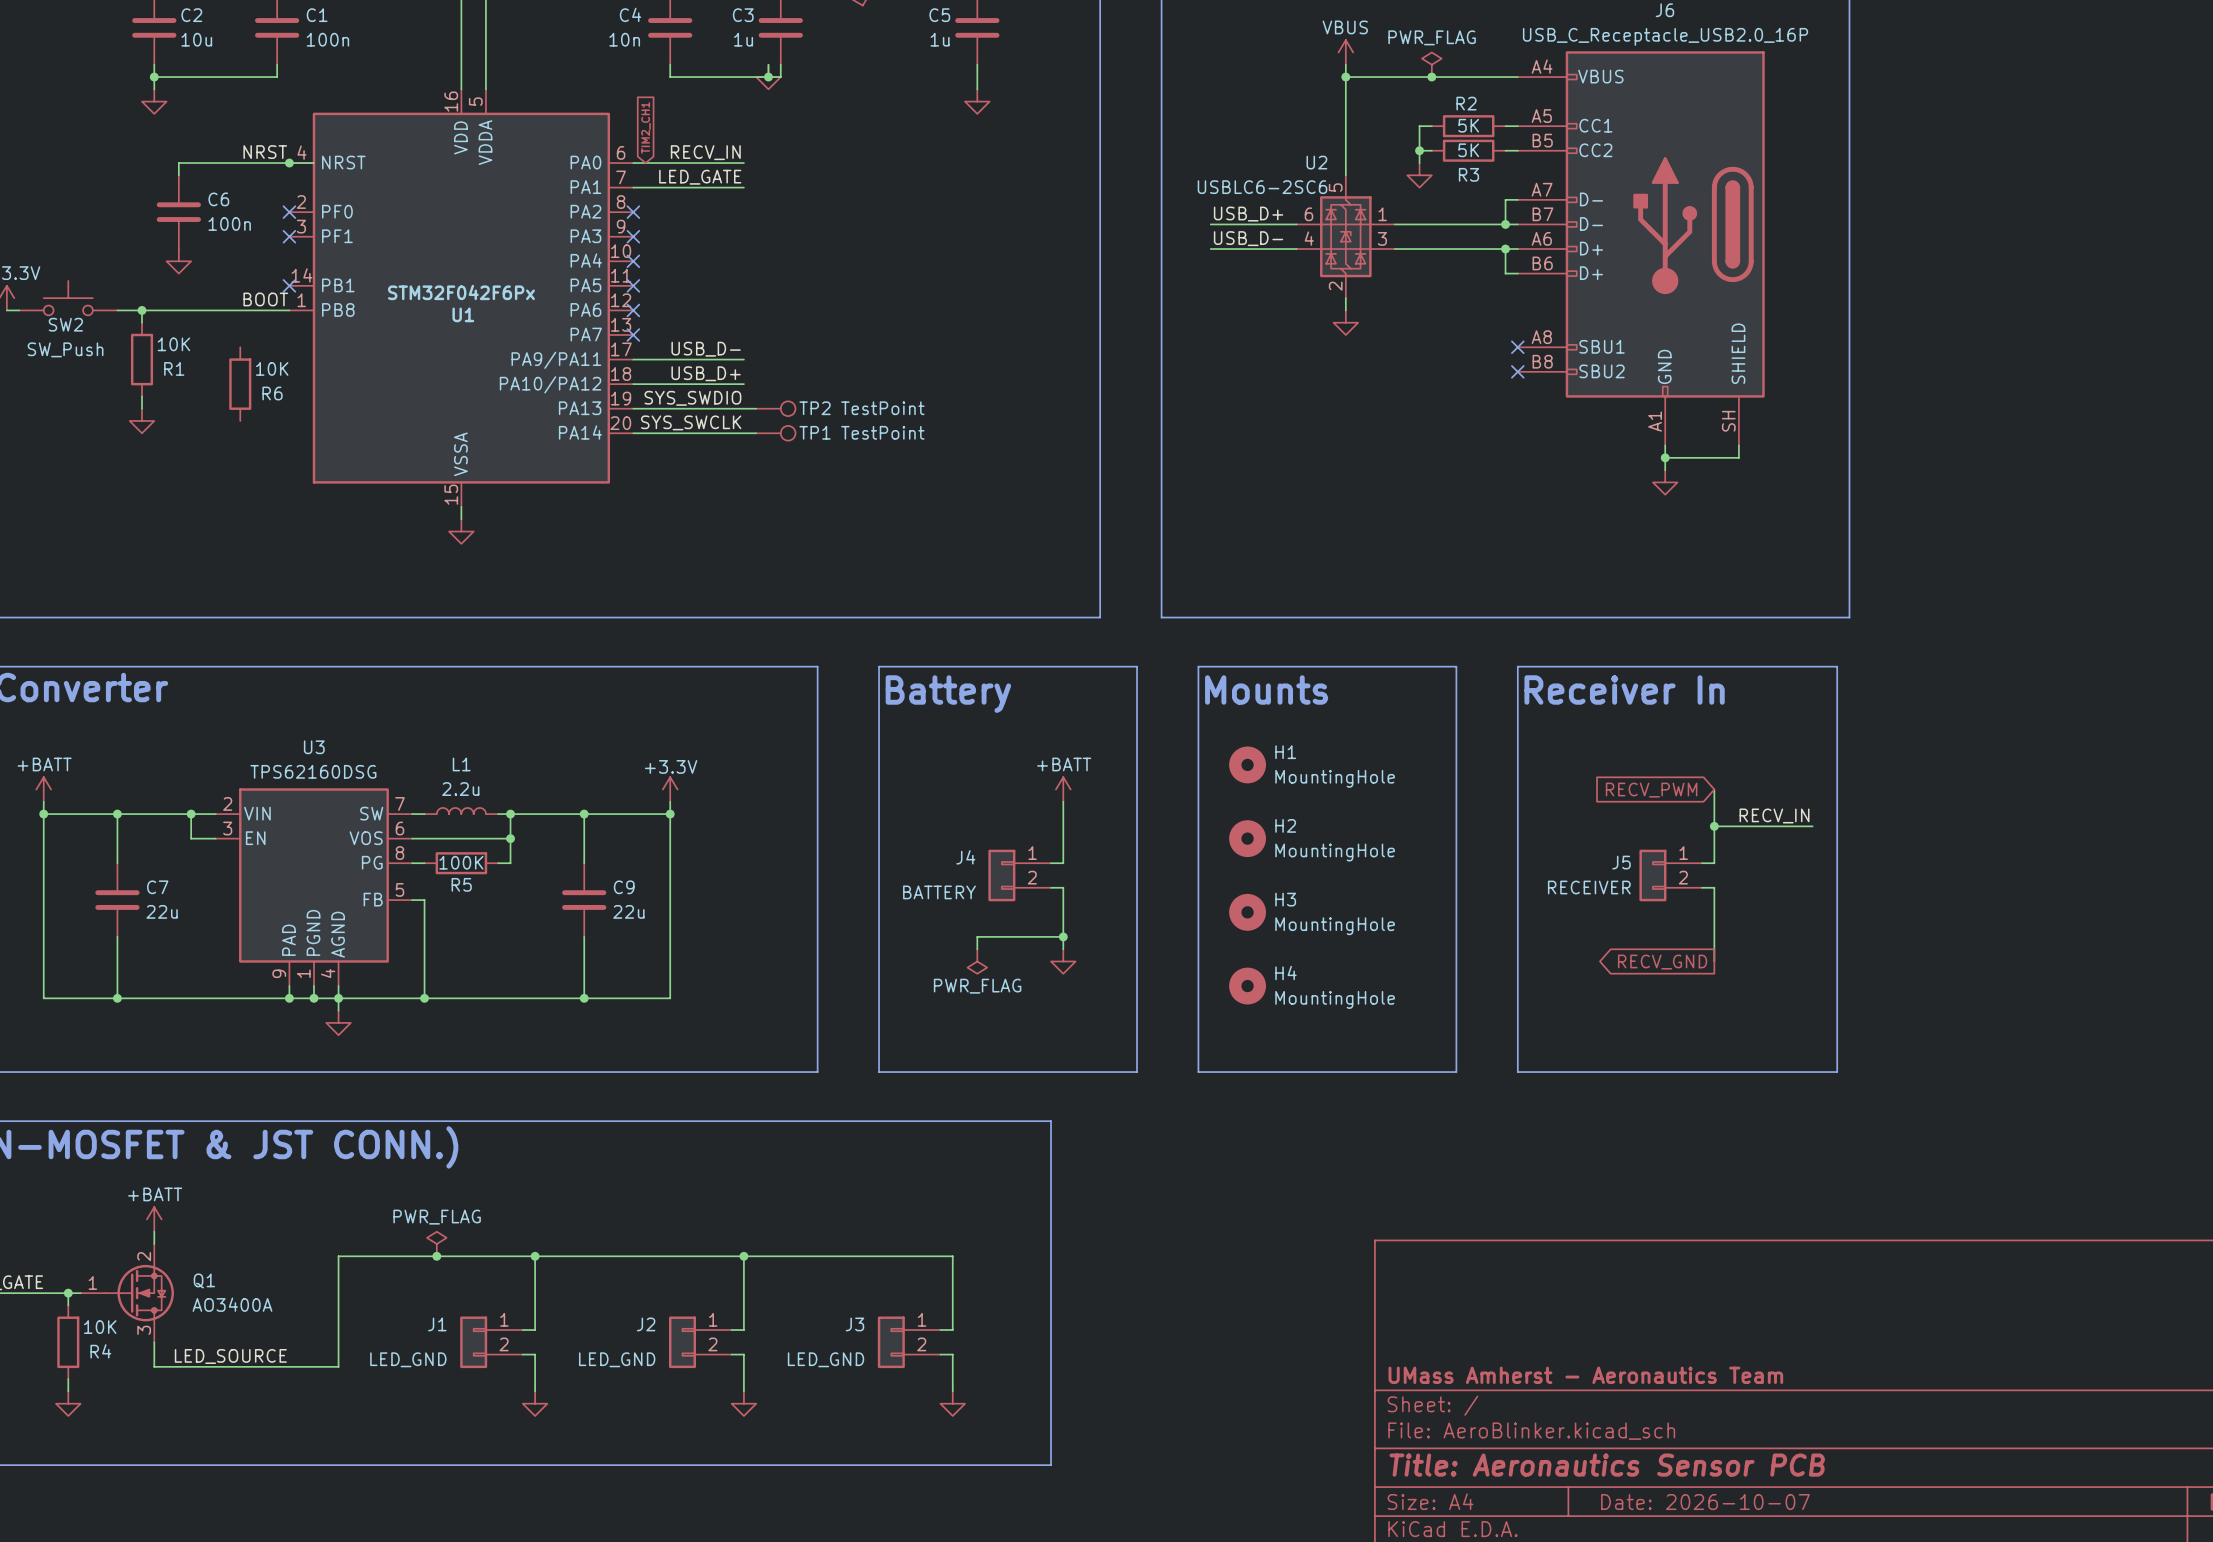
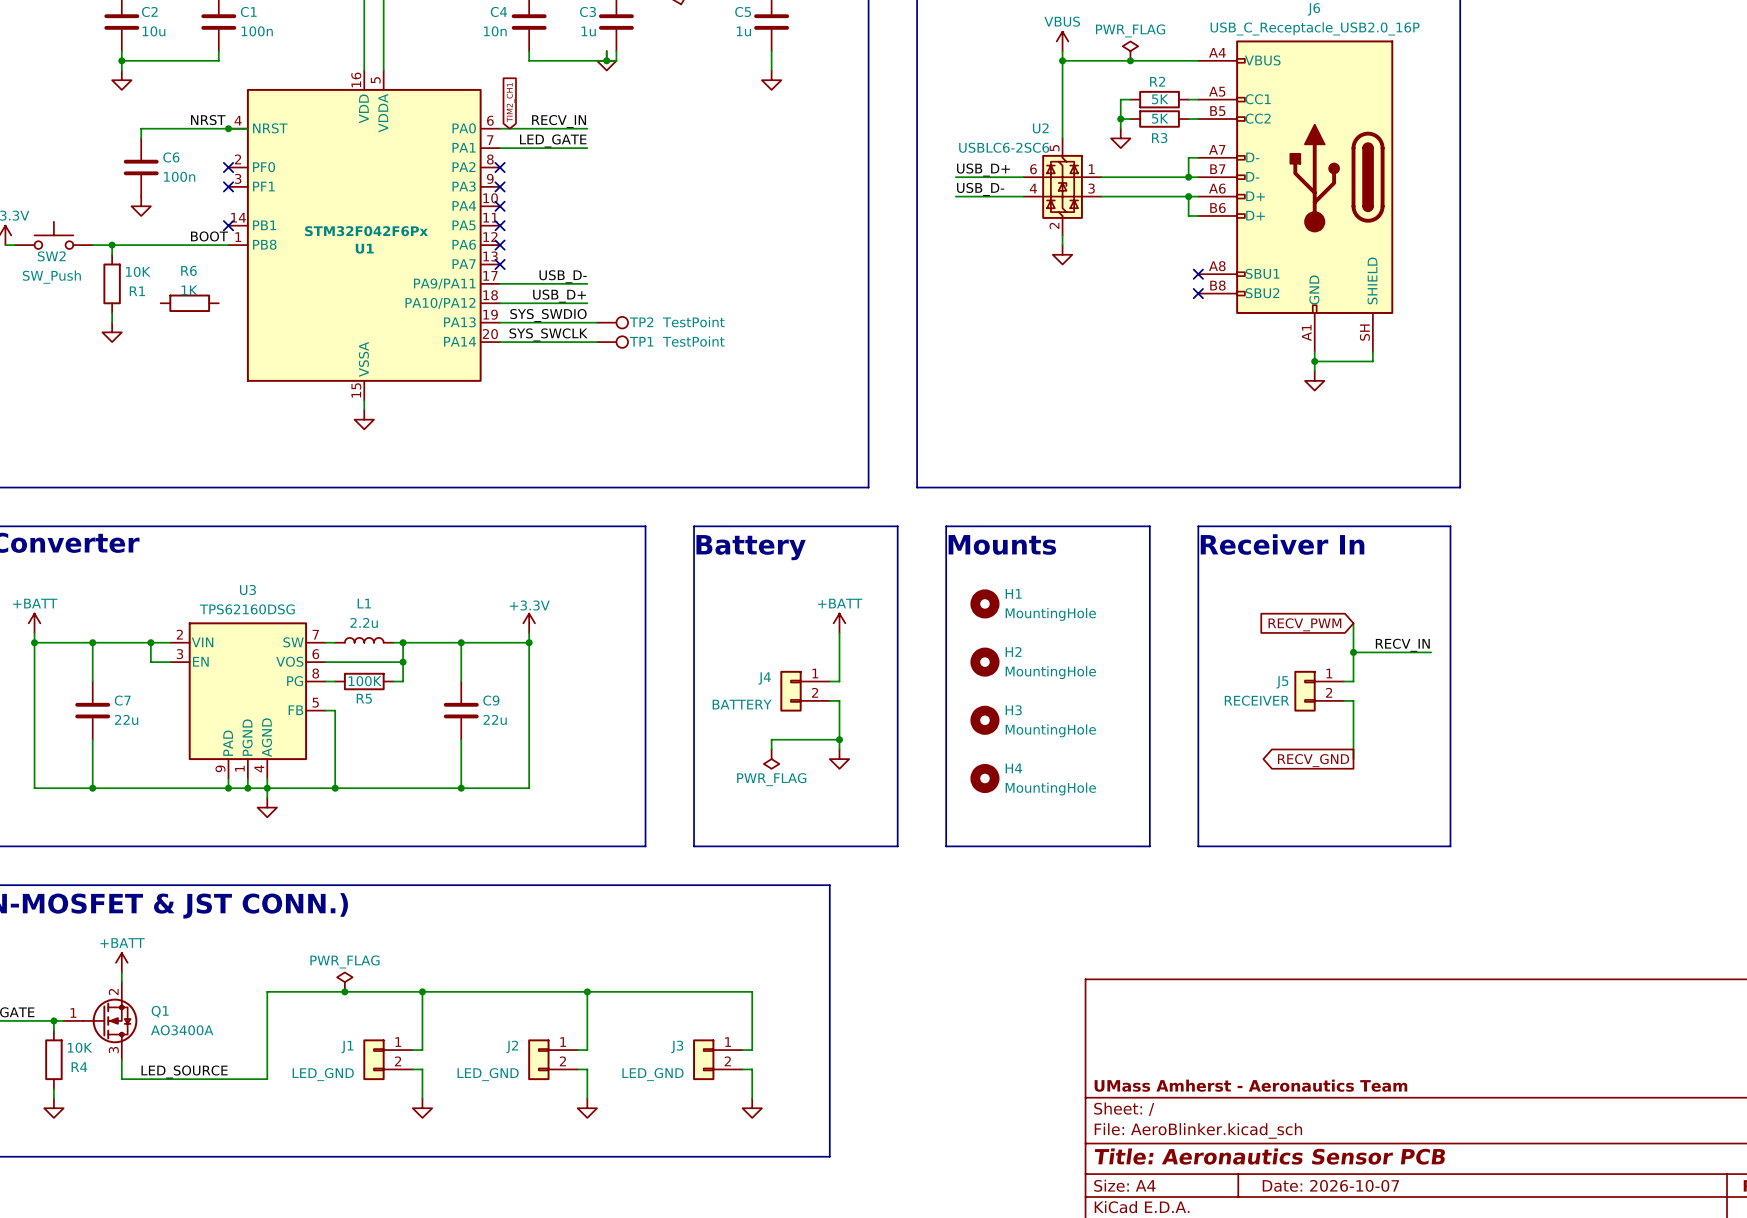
R6 value: 10K (272, 368) -> 1K (189, 290)
R6 rotation: 0° (240, 384) -> 90° clockwise (189, 303)
R6 name position: R6 (272, 393) -> R6 (188, 270)

